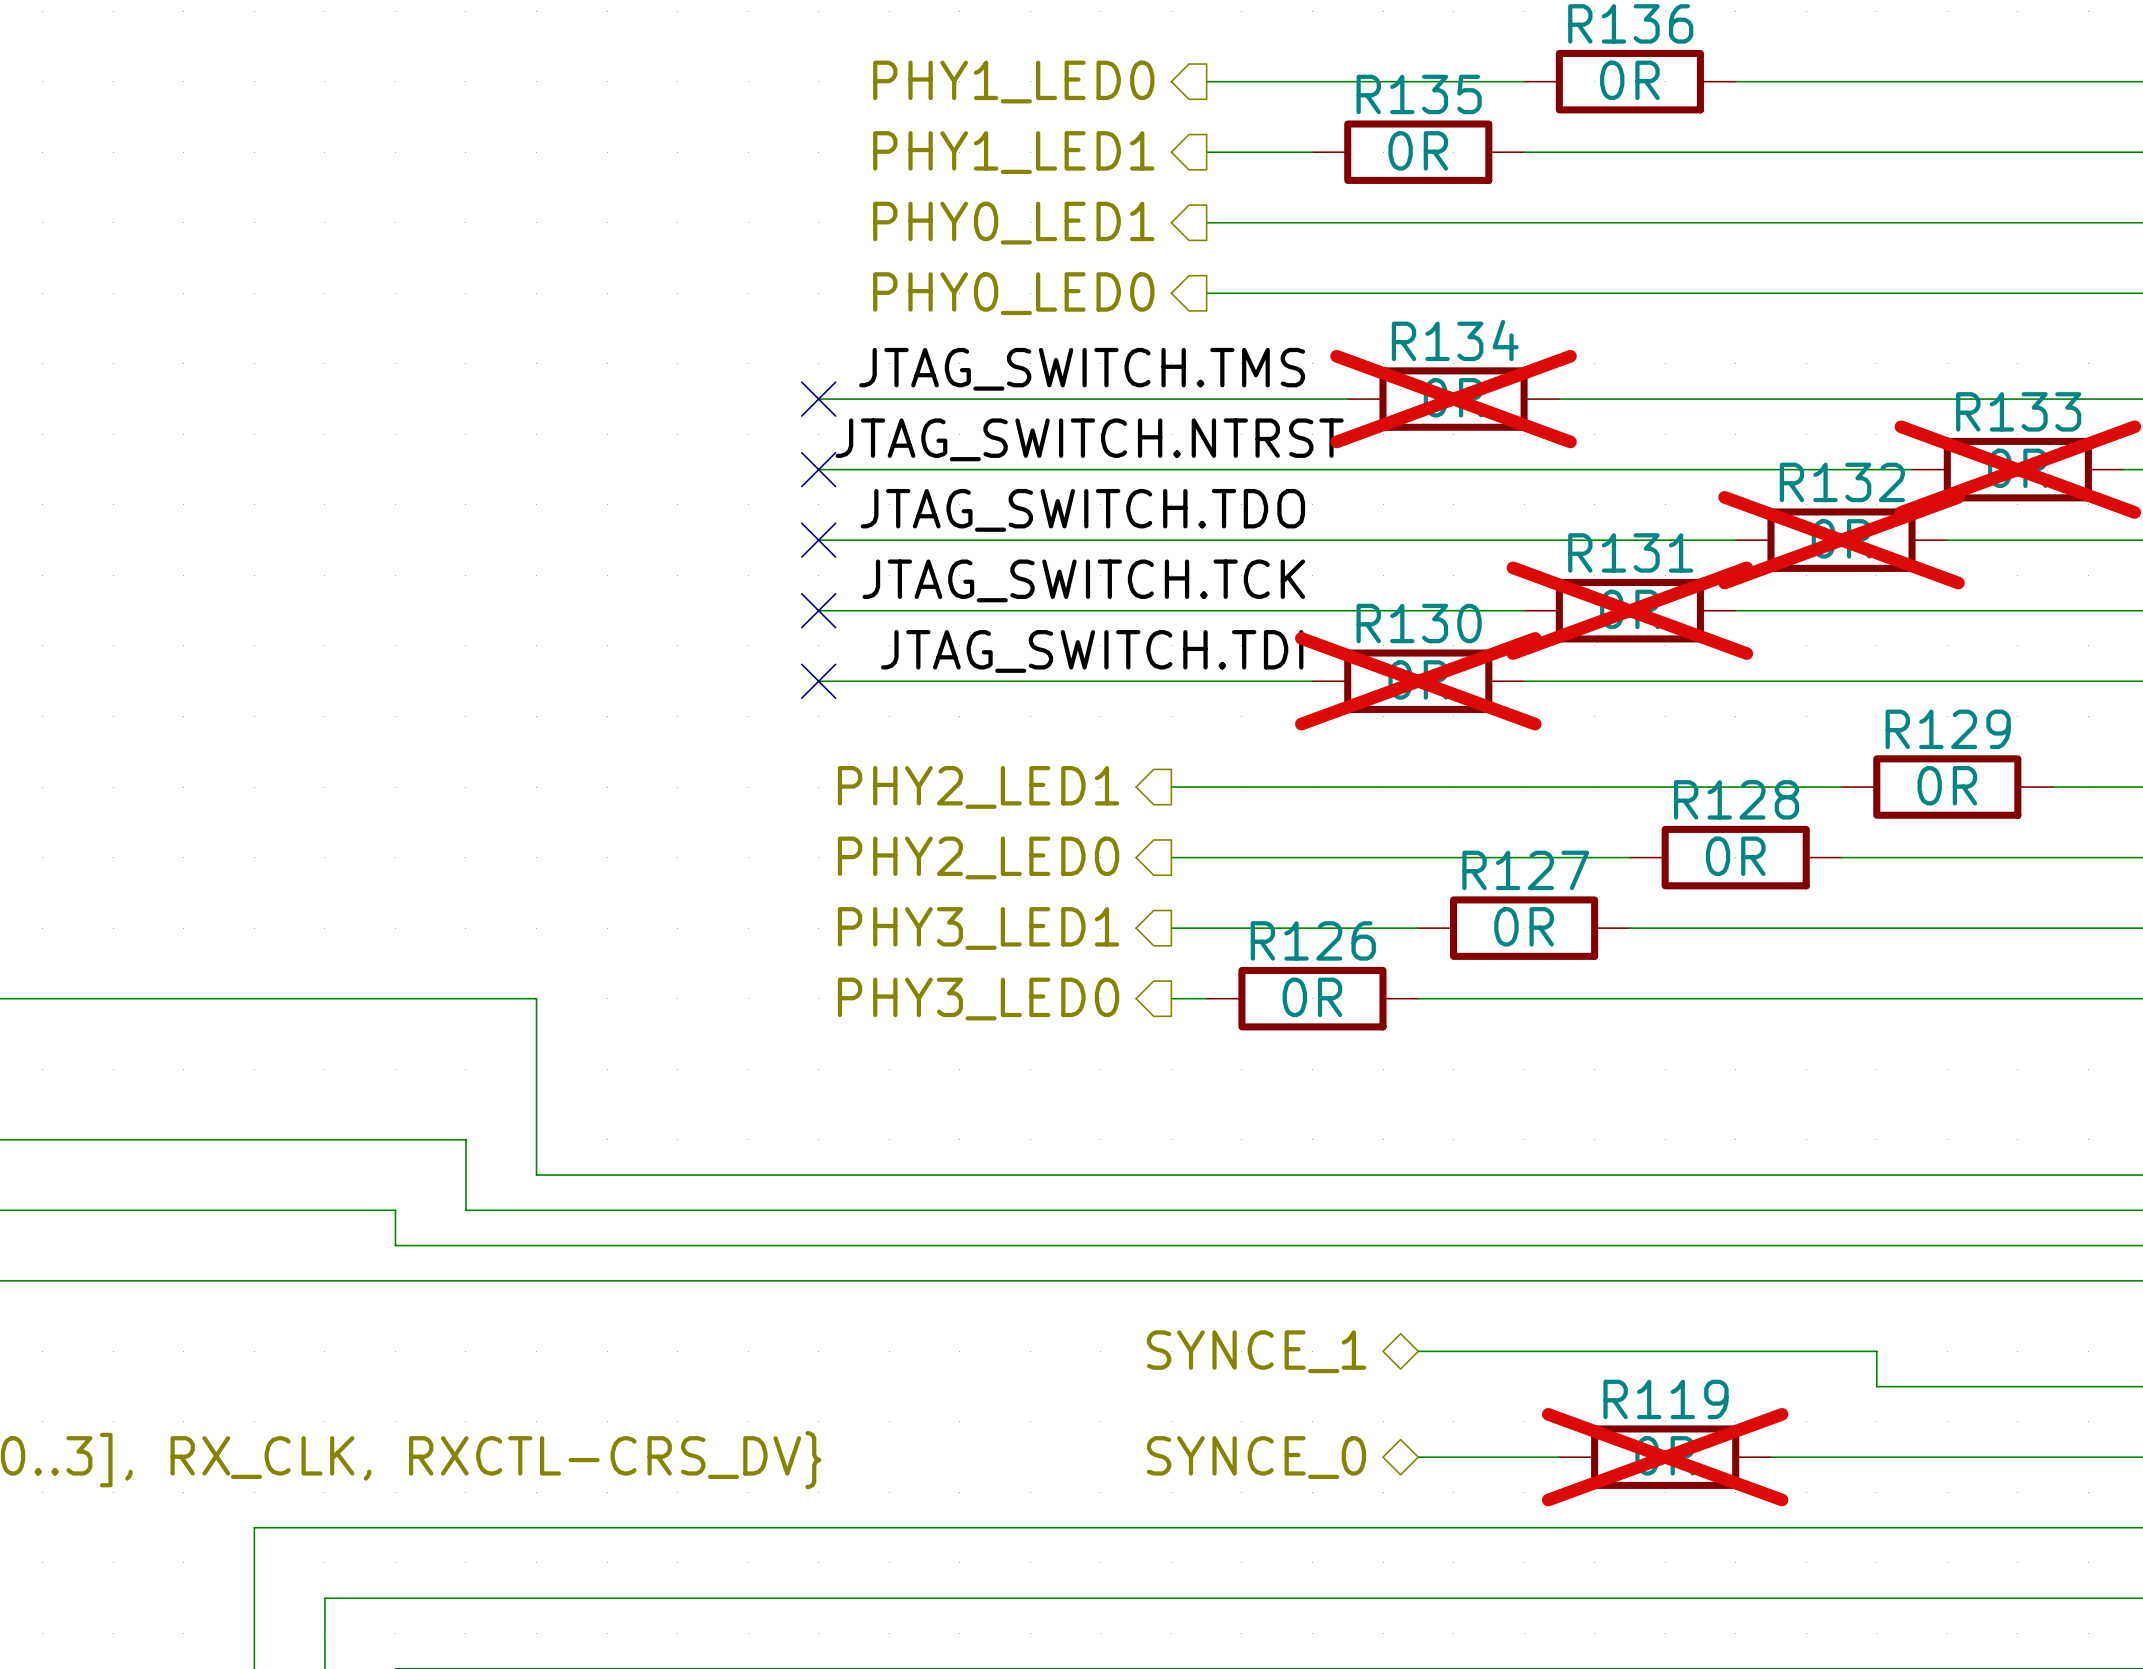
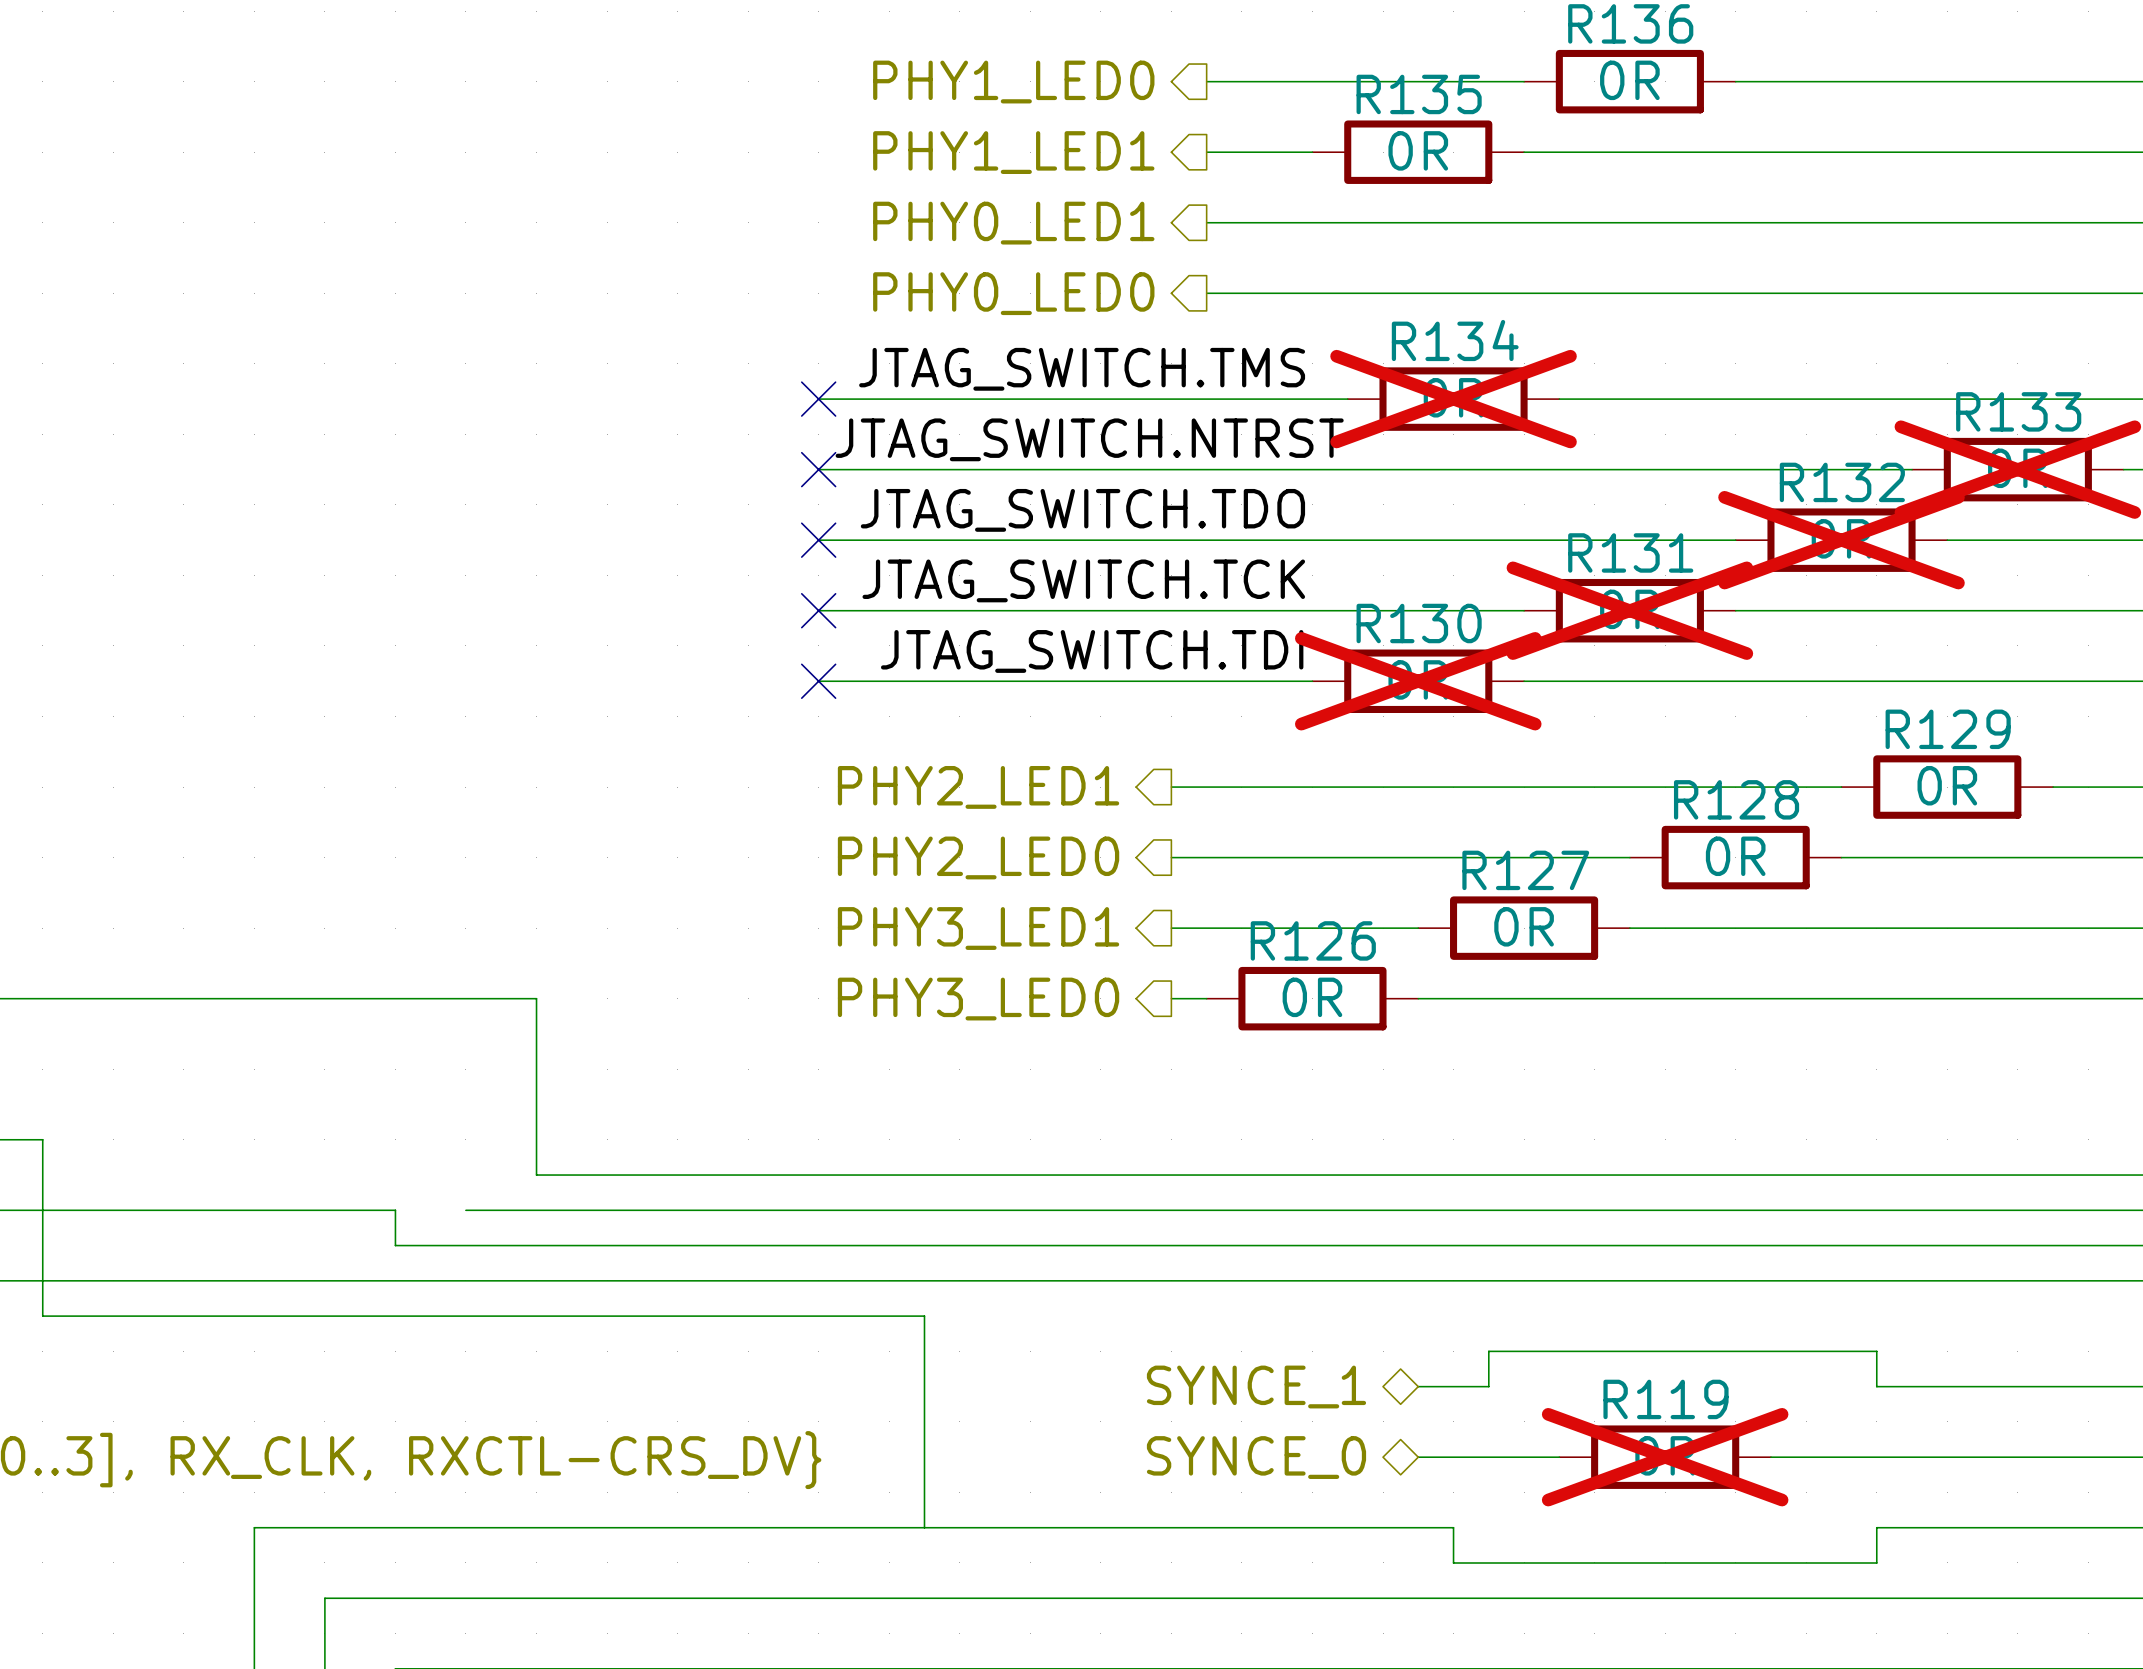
wire: (42, 1139) (465, 1139) (465, 1210) -> (42, 1139) (42, 1316) (924, 1316) (924, 1527)
hierarchical label position: SYNCE_1 (1256, 1351) -> SYNCE_1 (1256, 1387)
wire: (1418, 1351) (1488, 1351) -> (1418, 1386) (1488, 1386) (1488, 1351)
wire: (1453, 1527) (1876, 1527) -> (1453, 1527) (1453, 1562) (1876, 1562) (1876, 1527)

